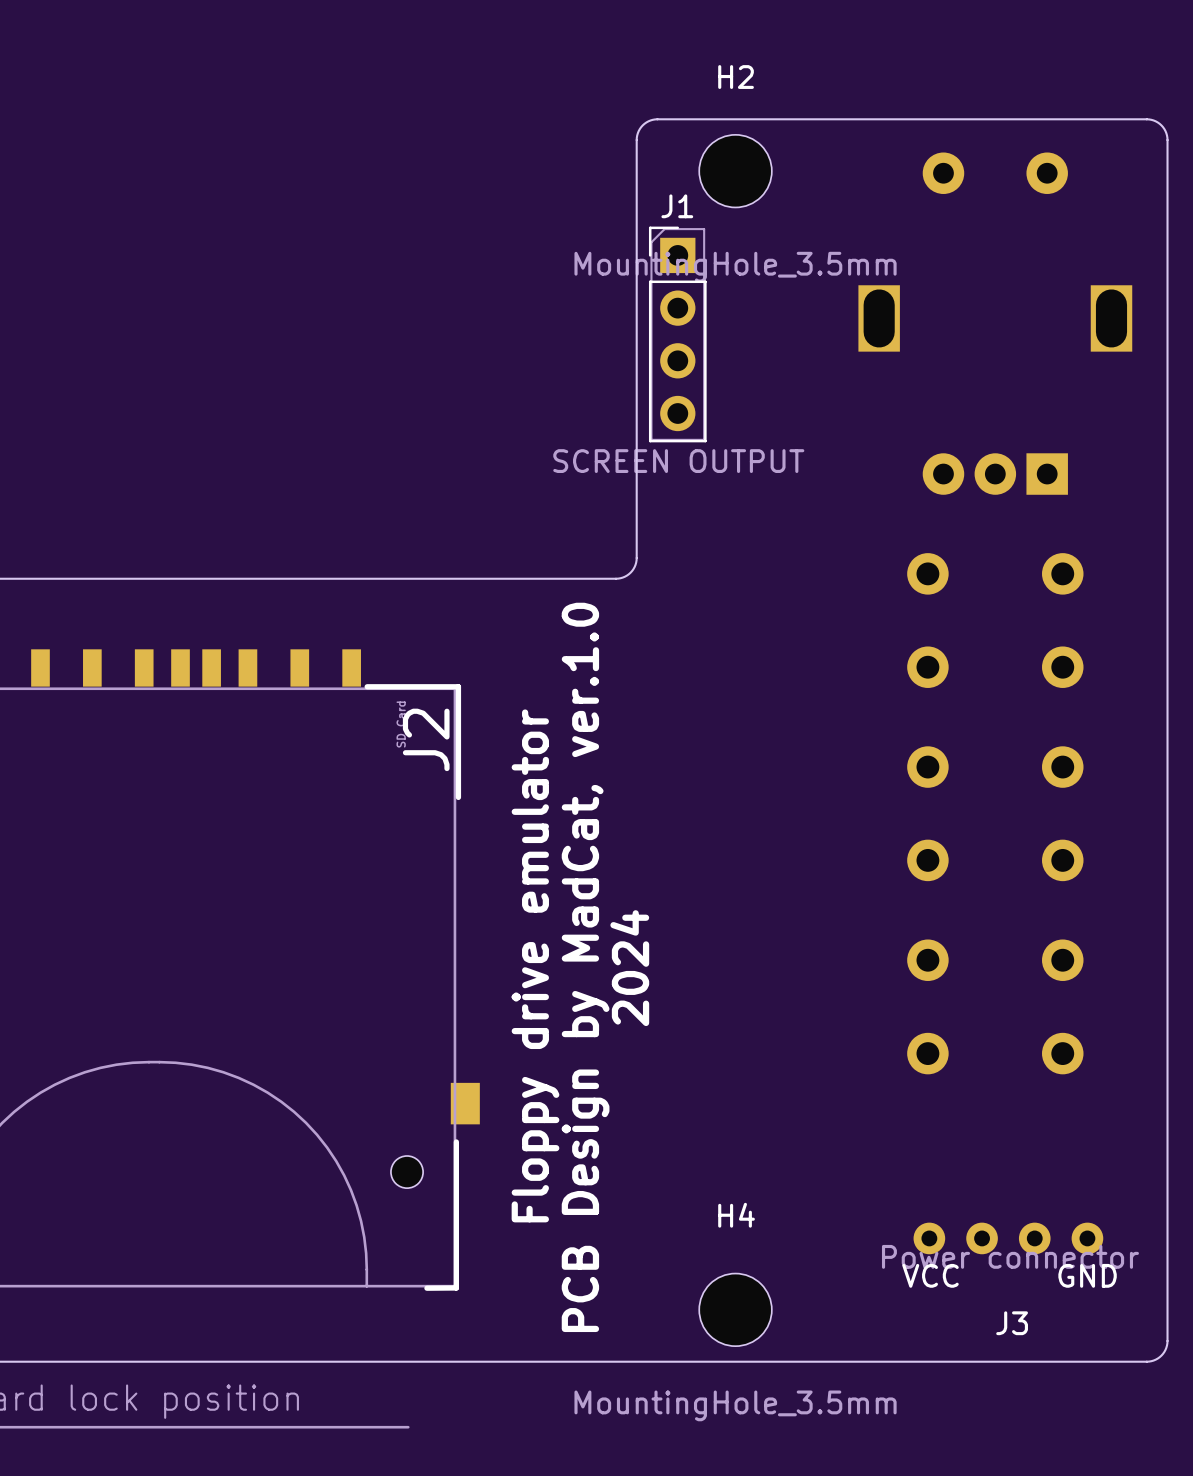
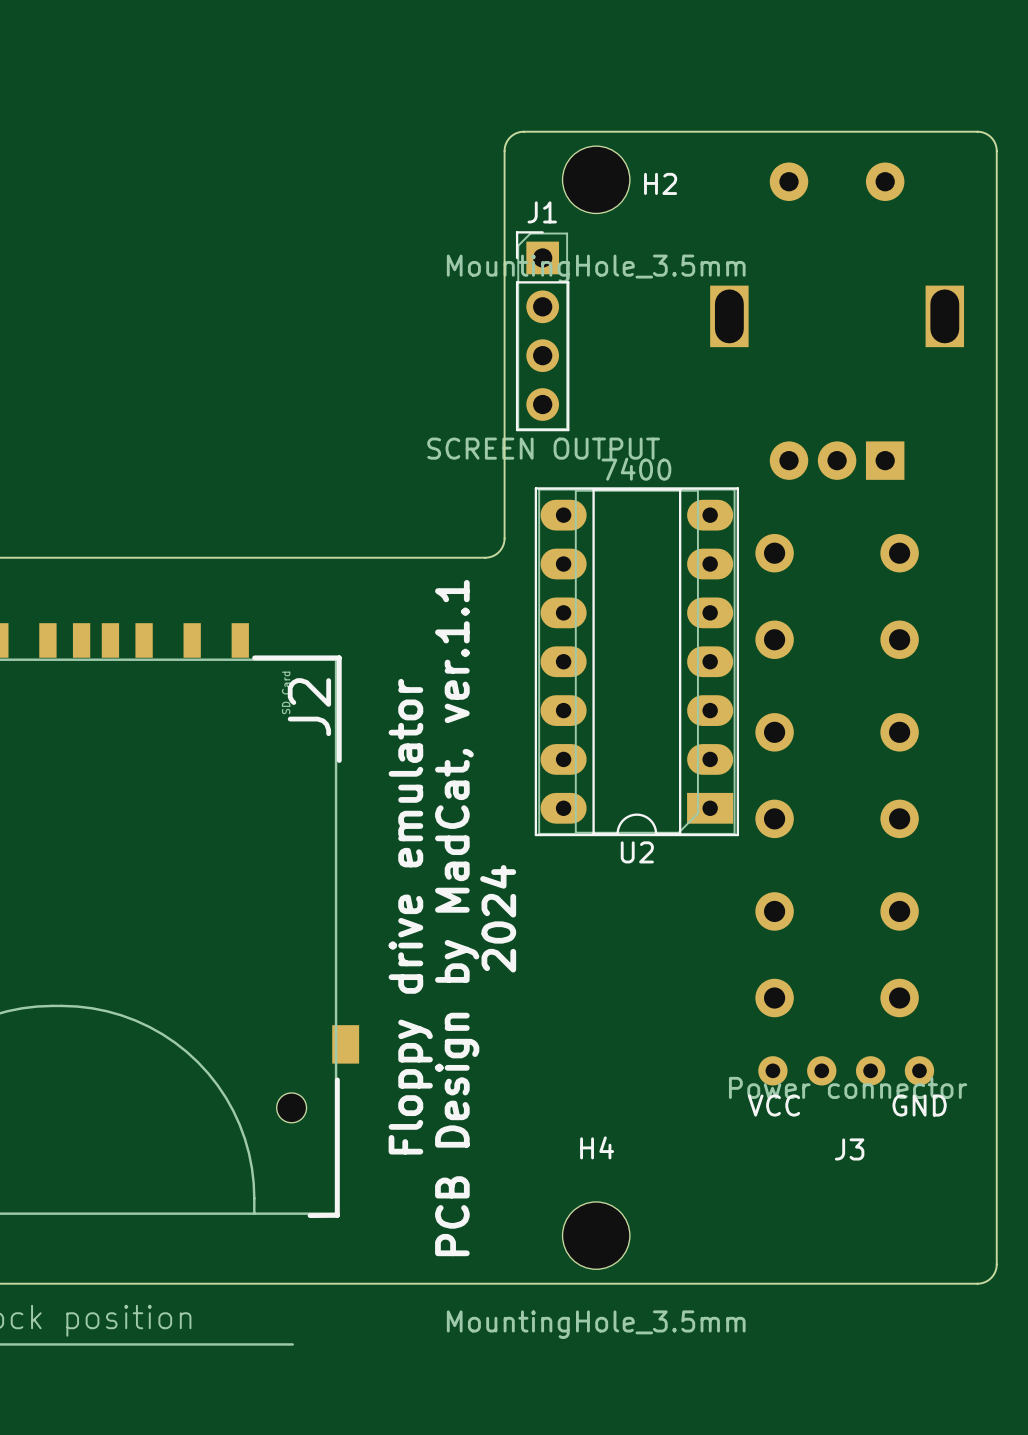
H2 name position: H2 (736, 77) -> H2 (660, 183)
U2: none -> 7400 (636, 661)
text: PCB Design by MadCat, ver.1.0 (585, 967) -> PCB Design by MadCat, ver.1.1 (457, 918)
J3 position: (1008, 1238) -> (846, 1070)

